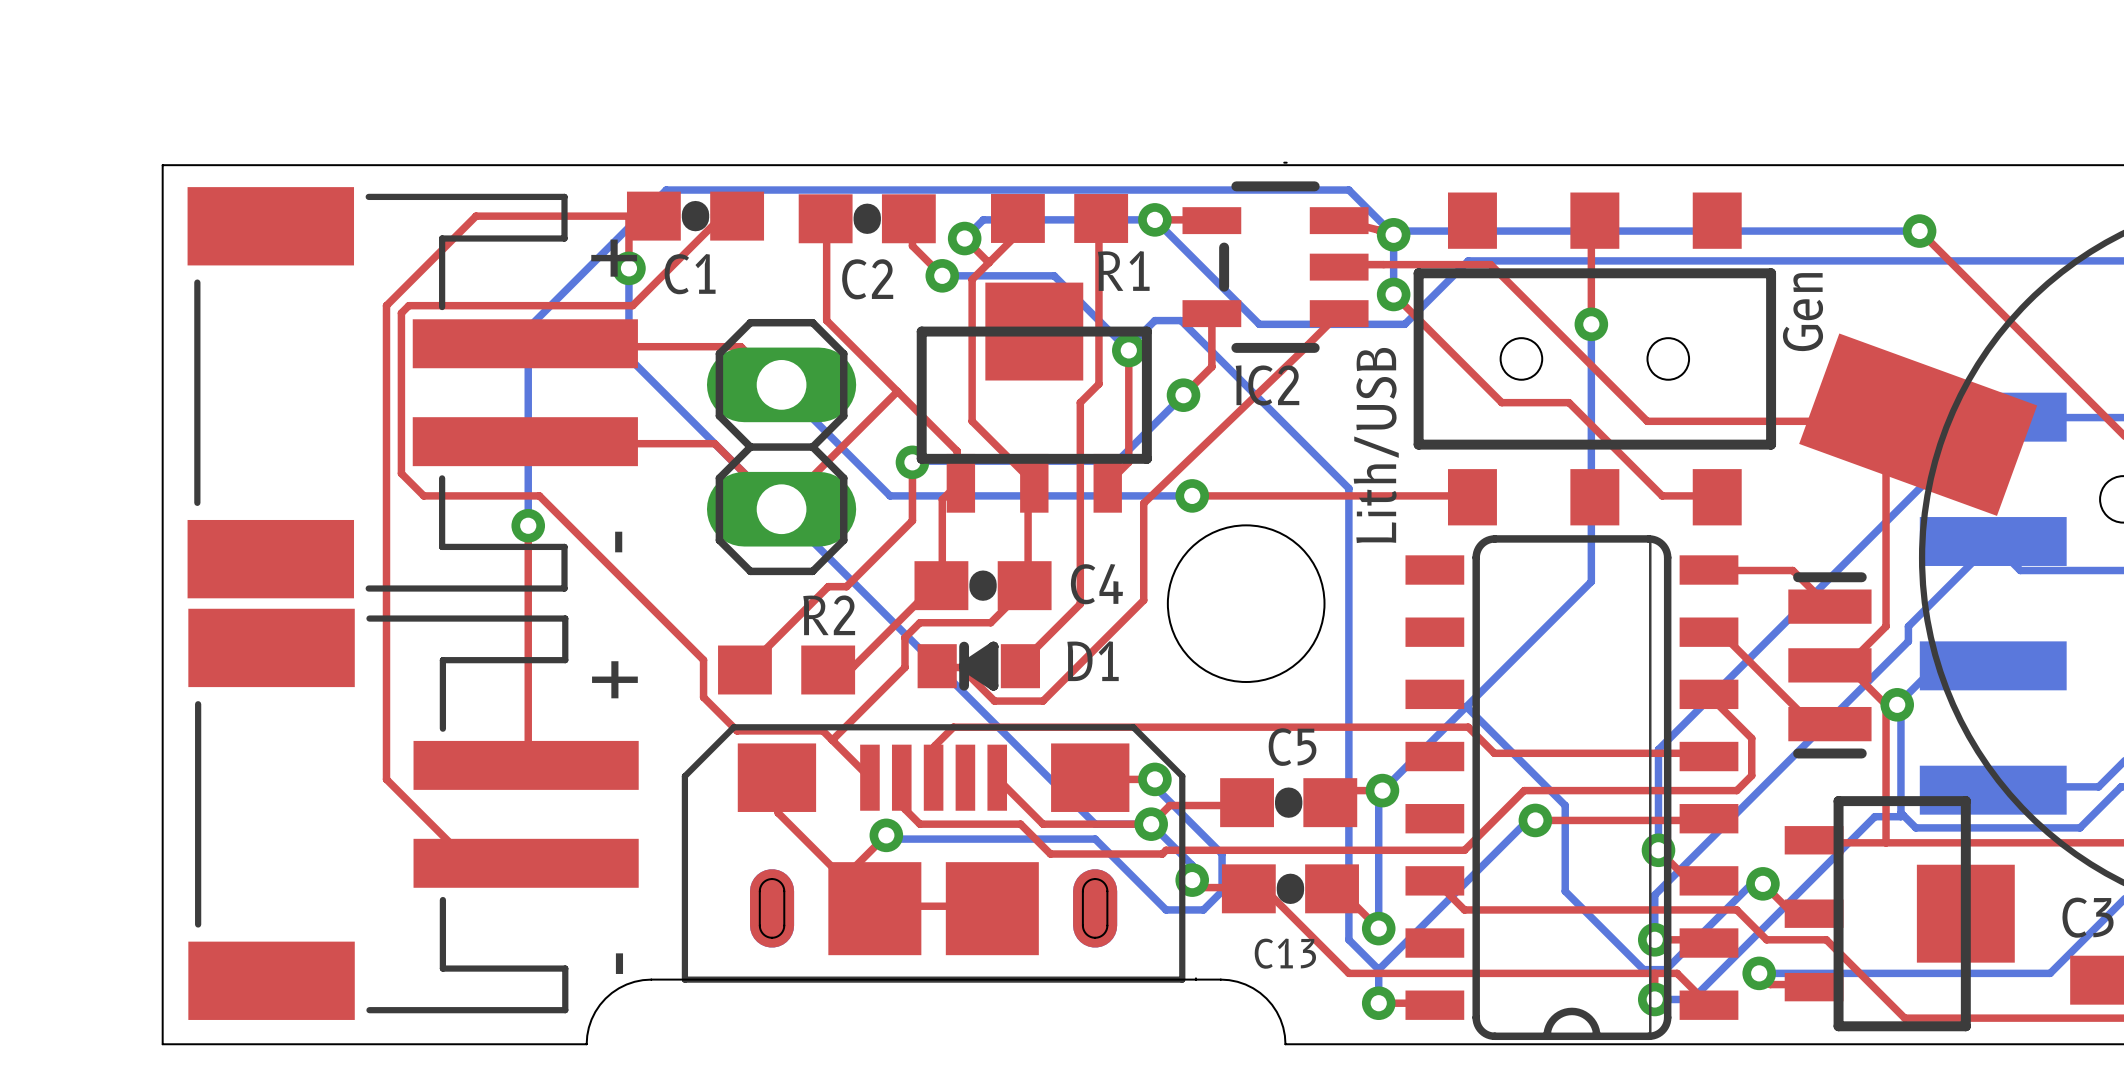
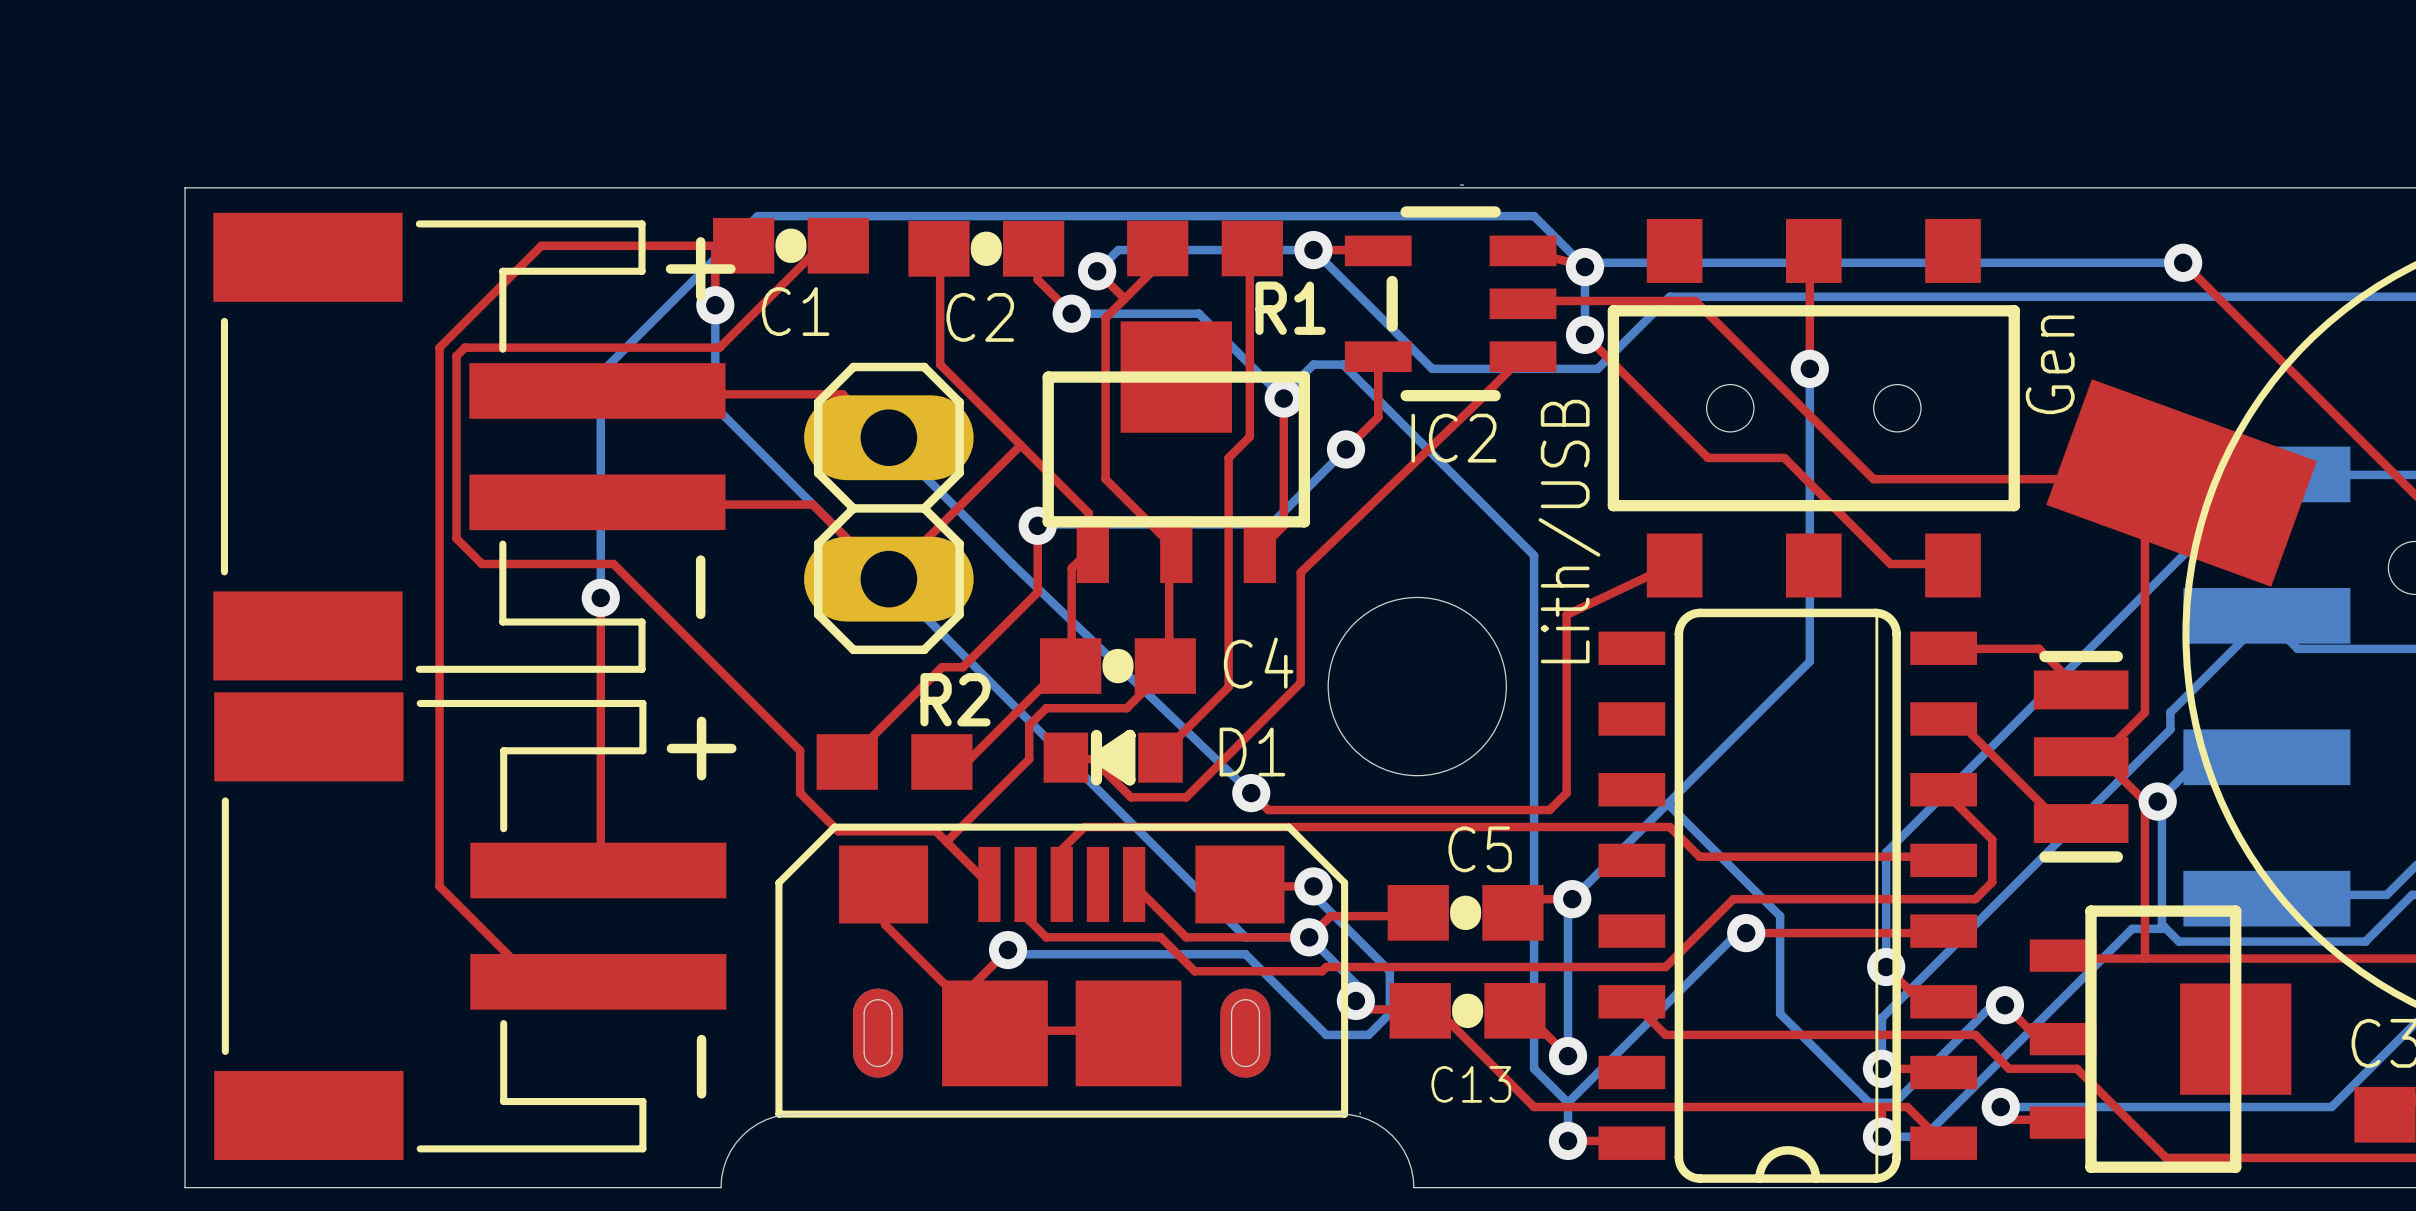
bottom track: (890, 495) (1192, 495) -> (1012, 564) (1251, 793)
top track: (1192, 495) (1471, 495) -> (1251, 793) (1268, 810) (1549, 810) (1566, 793) (1566, 614) (1674, 564)
via position: (1192, 495) -> (1251, 793)
board edge: (698, 979) (642, 980) (619, 988) (605, 998) (595, 1011) (588, 1027) (586, 1044) -> (794, 1114) (766, 1119) (742, 1135) (726, 1159) (720, 1187) (667, 1187)
board edge: (1178, 979) (1229, 980) (1253, 988) (1266, 998) (1276, 1011) (1283, 1027) (1285, 1044) -> (1340, 1114) (1368, 1119) (1392, 1135) (1408, 1159) (1413, 1187) (1461, 1187)

